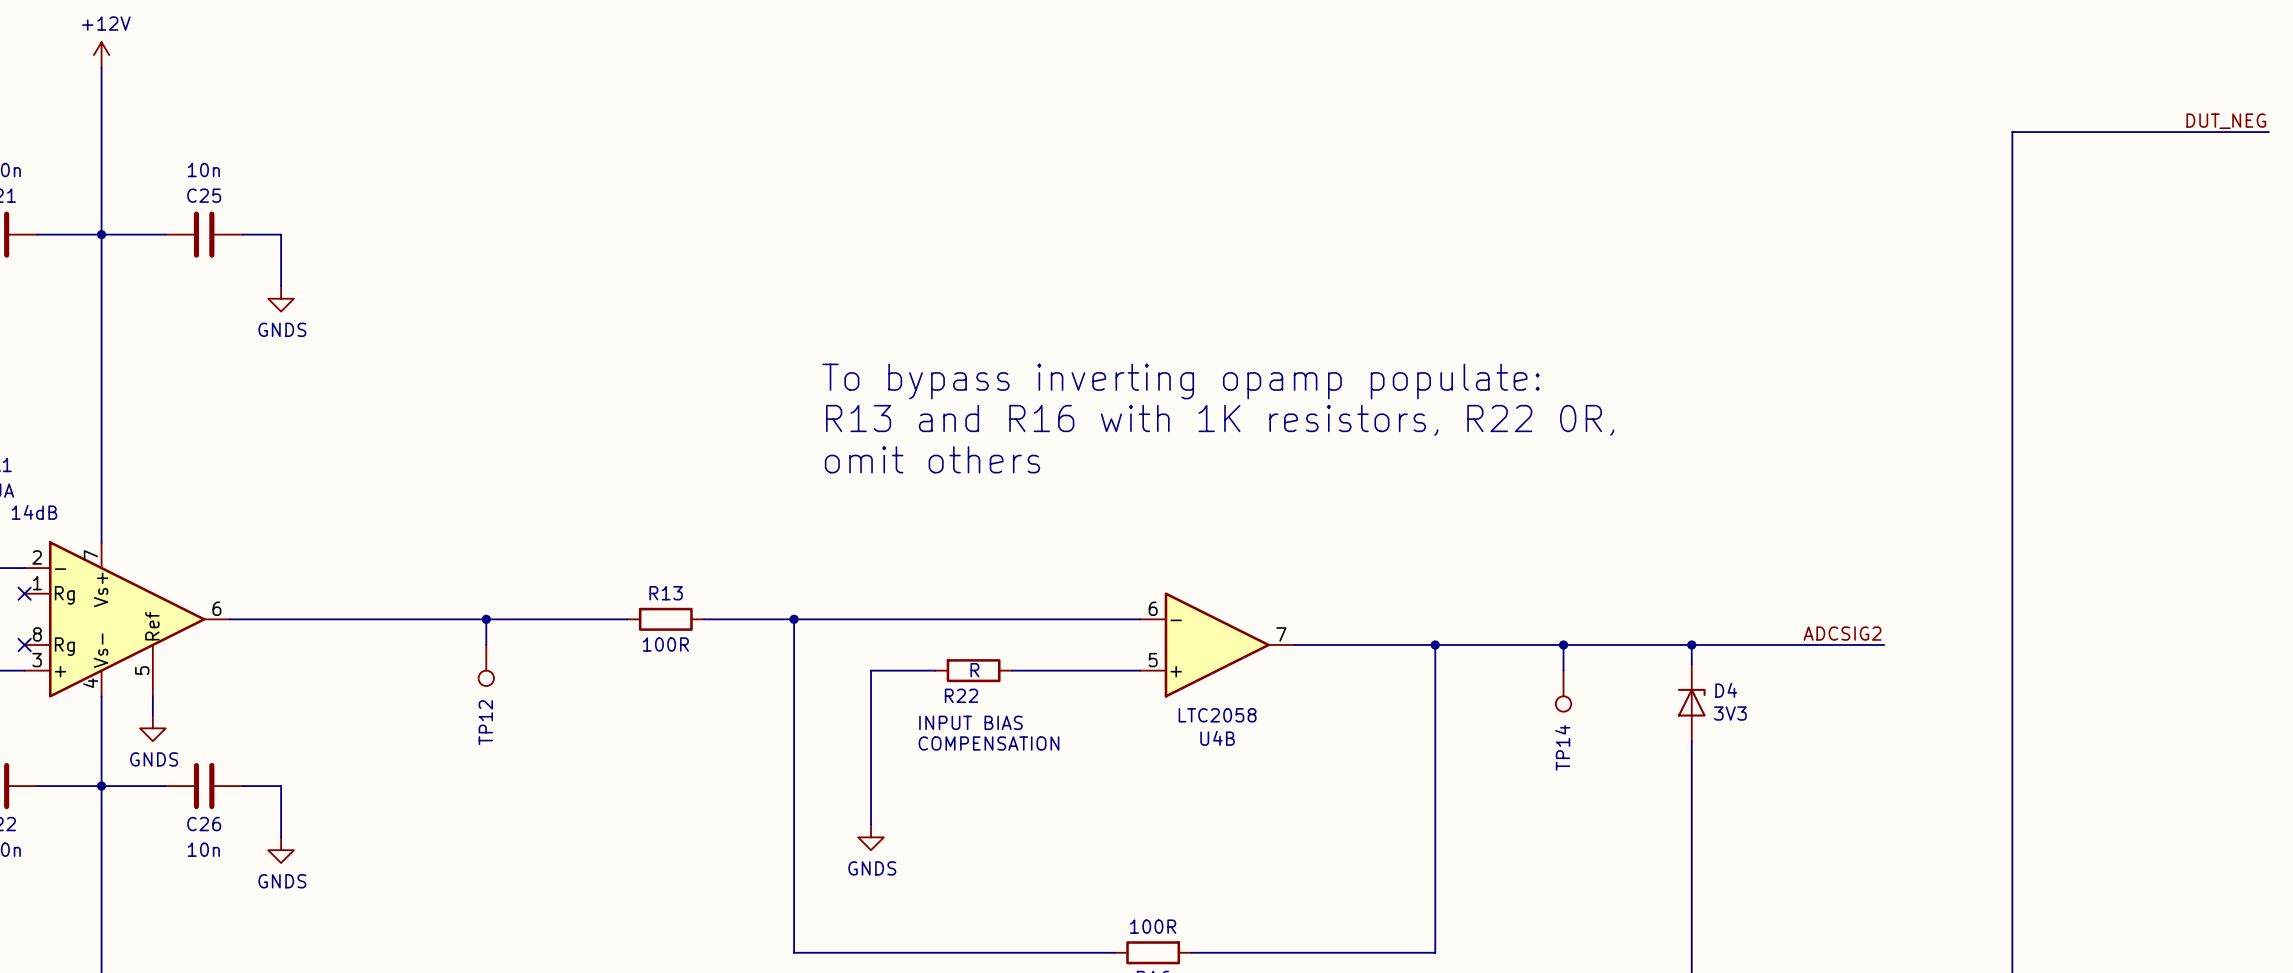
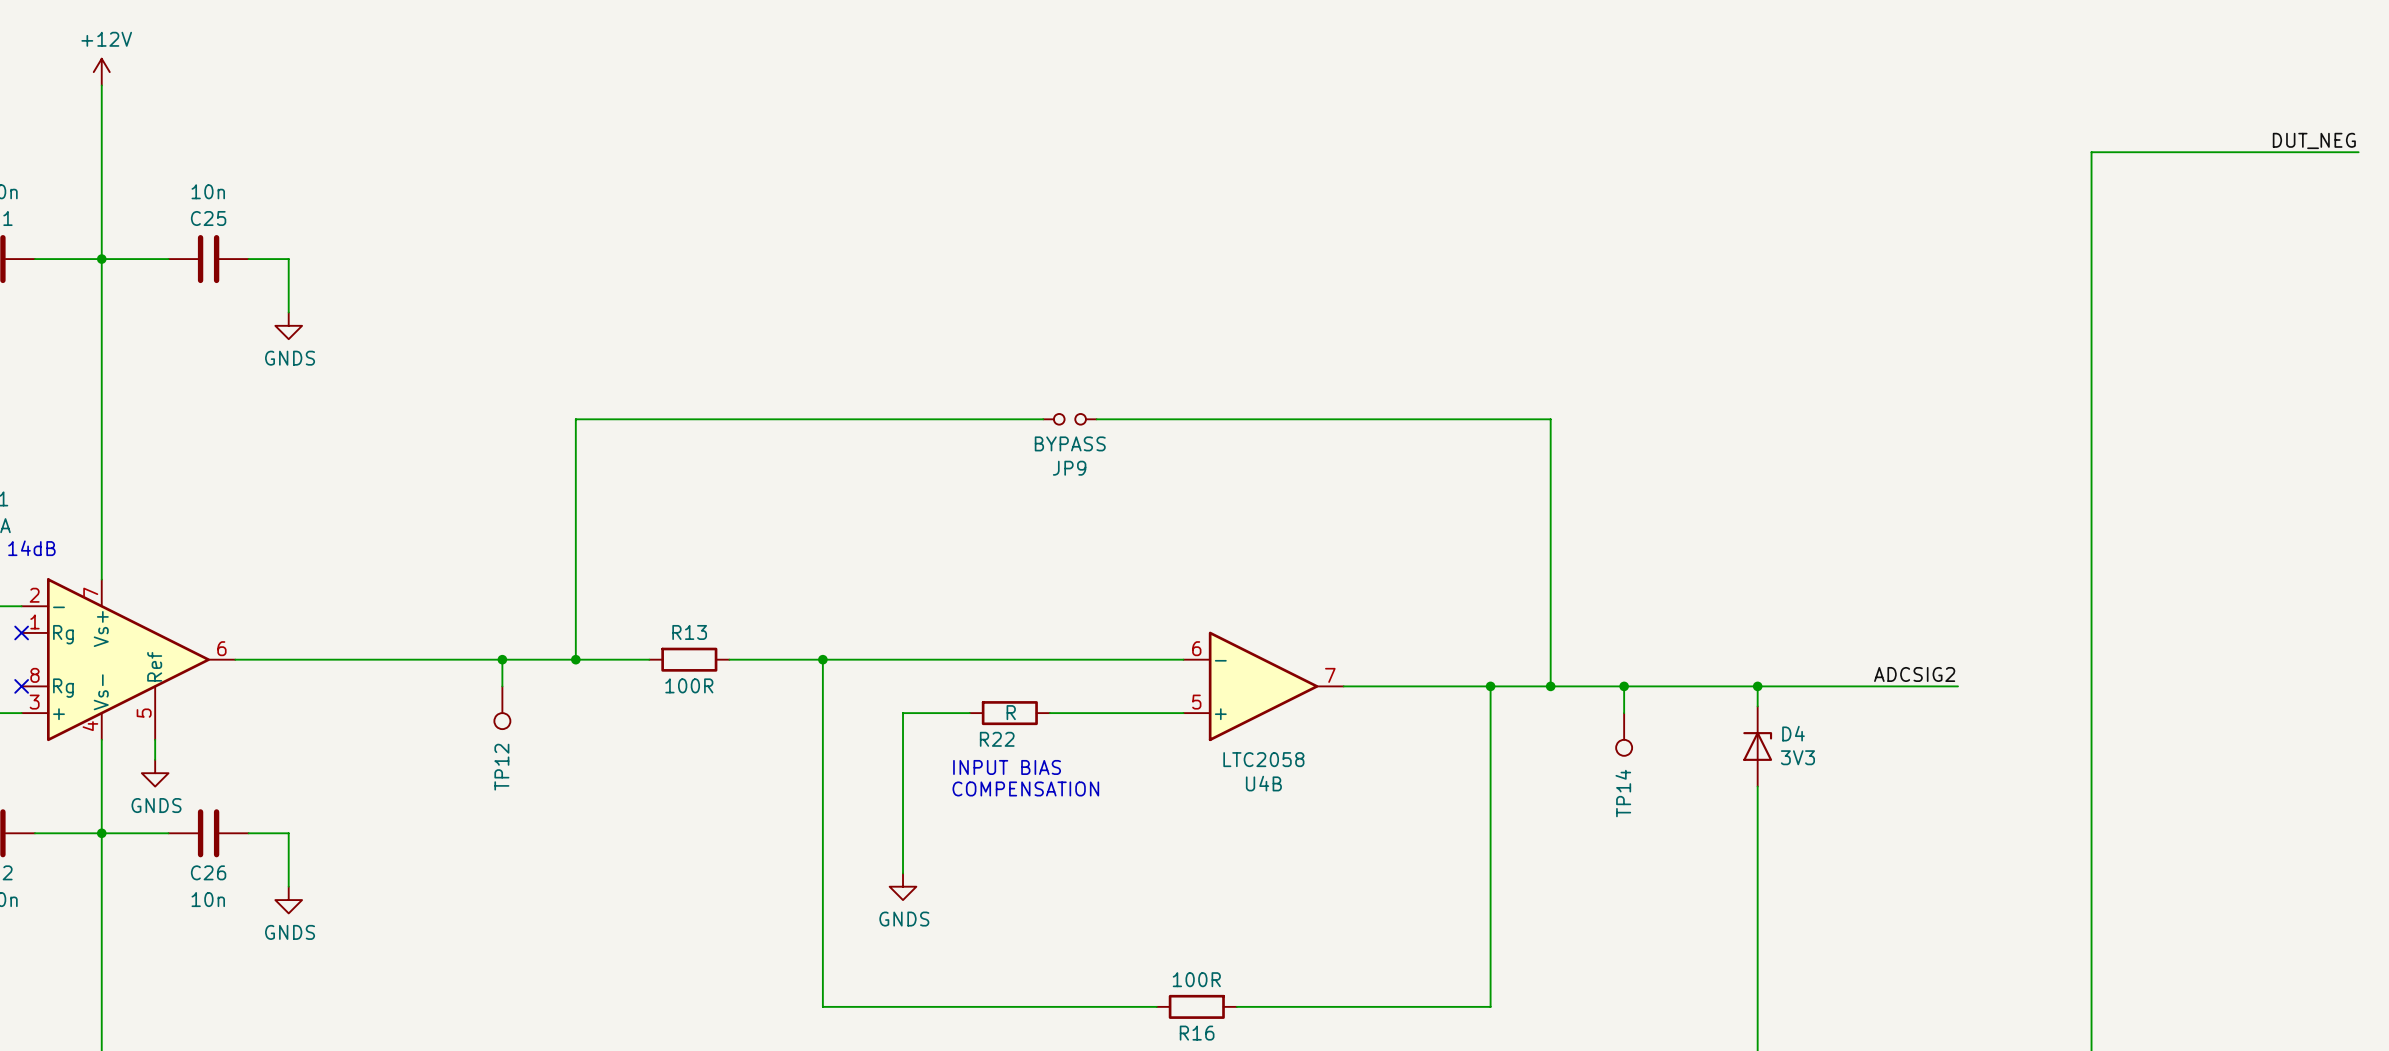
text: To bypass inverting opamp populate: (1181, 381) -> none
wire: none -> (1043, 419) (575, 419) (575, 659)
JP9: none -> BYPASS (1069, 419)
wire: none -> (1096, 419) (1550, 419) (1550, 686)
text: R13 and R16 with 1K resistors, R22 0R, (1220, 420) -> none
text: omit others (932, 459) -> none
junction: none -> (575, 659)
junction: none -> (1550, 686)

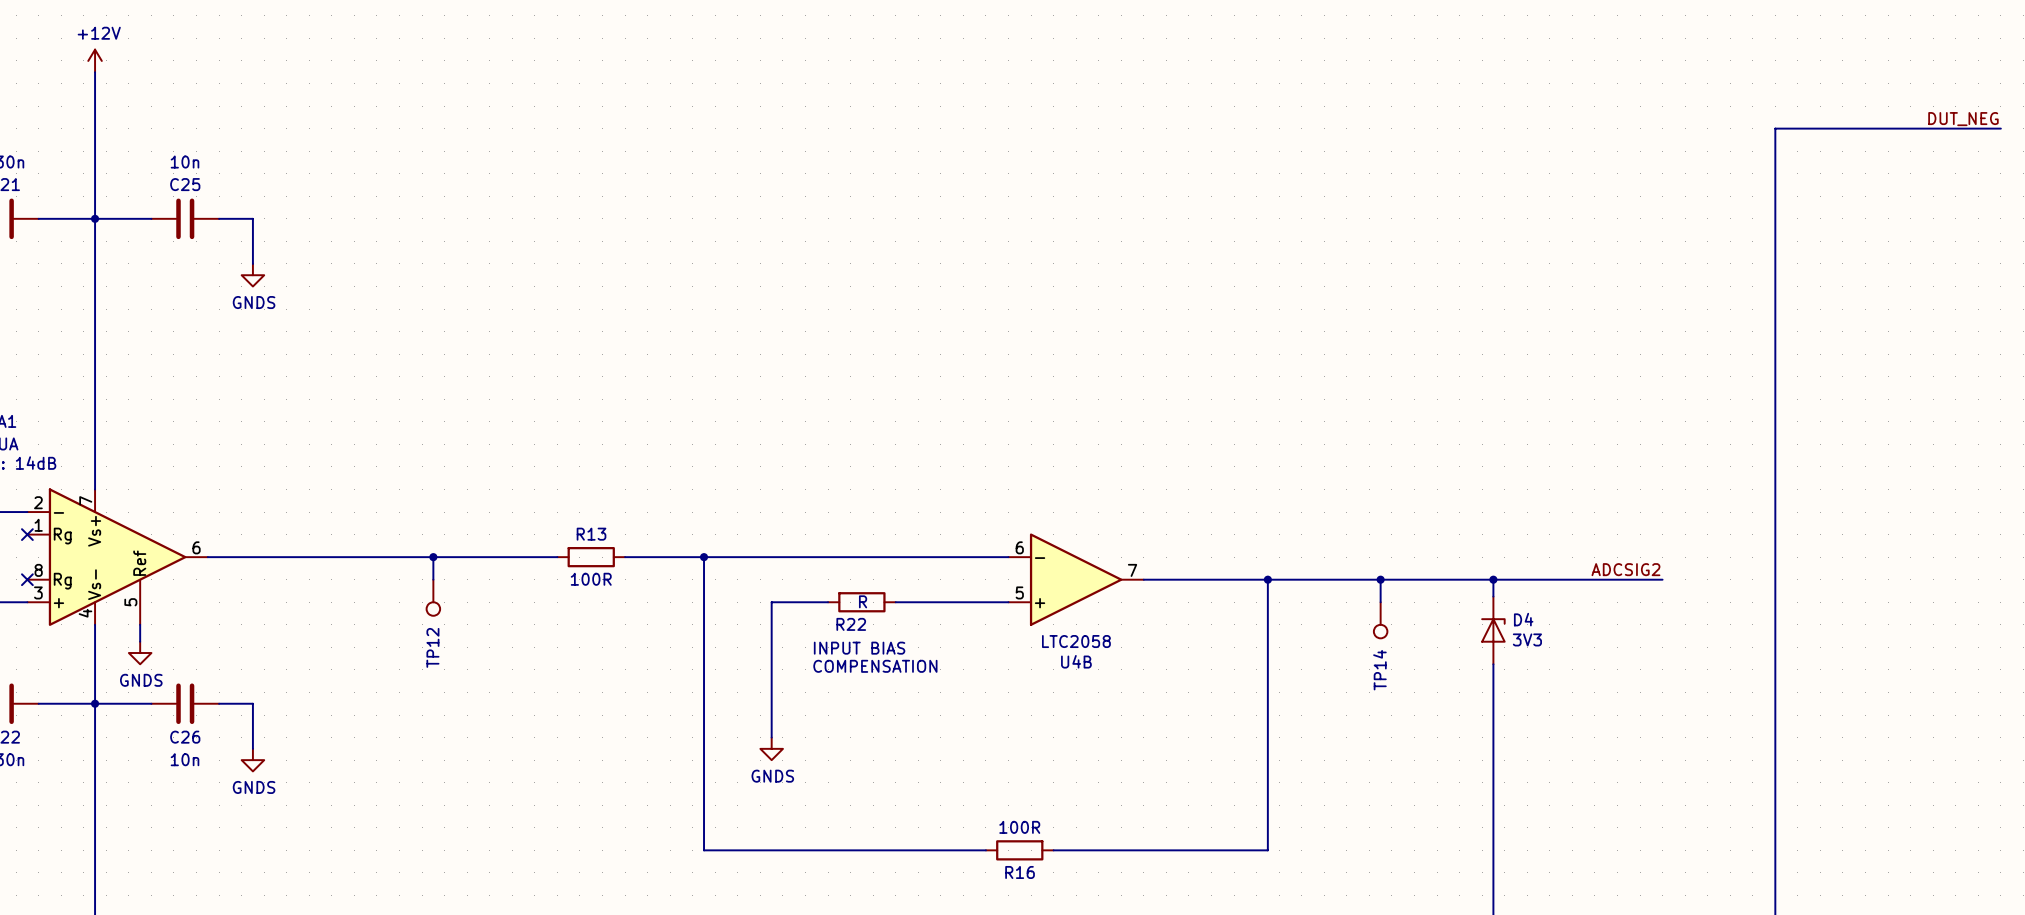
wire: (1043, 419) (575, 419) (575, 659) -> none
JP9: BYPASS (1069, 419) -> none
wire: (1096, 419) (1550, 419) (1550, 686) -> none
junction: (575, 659) -> none
junction: (1550, 686) -> none

